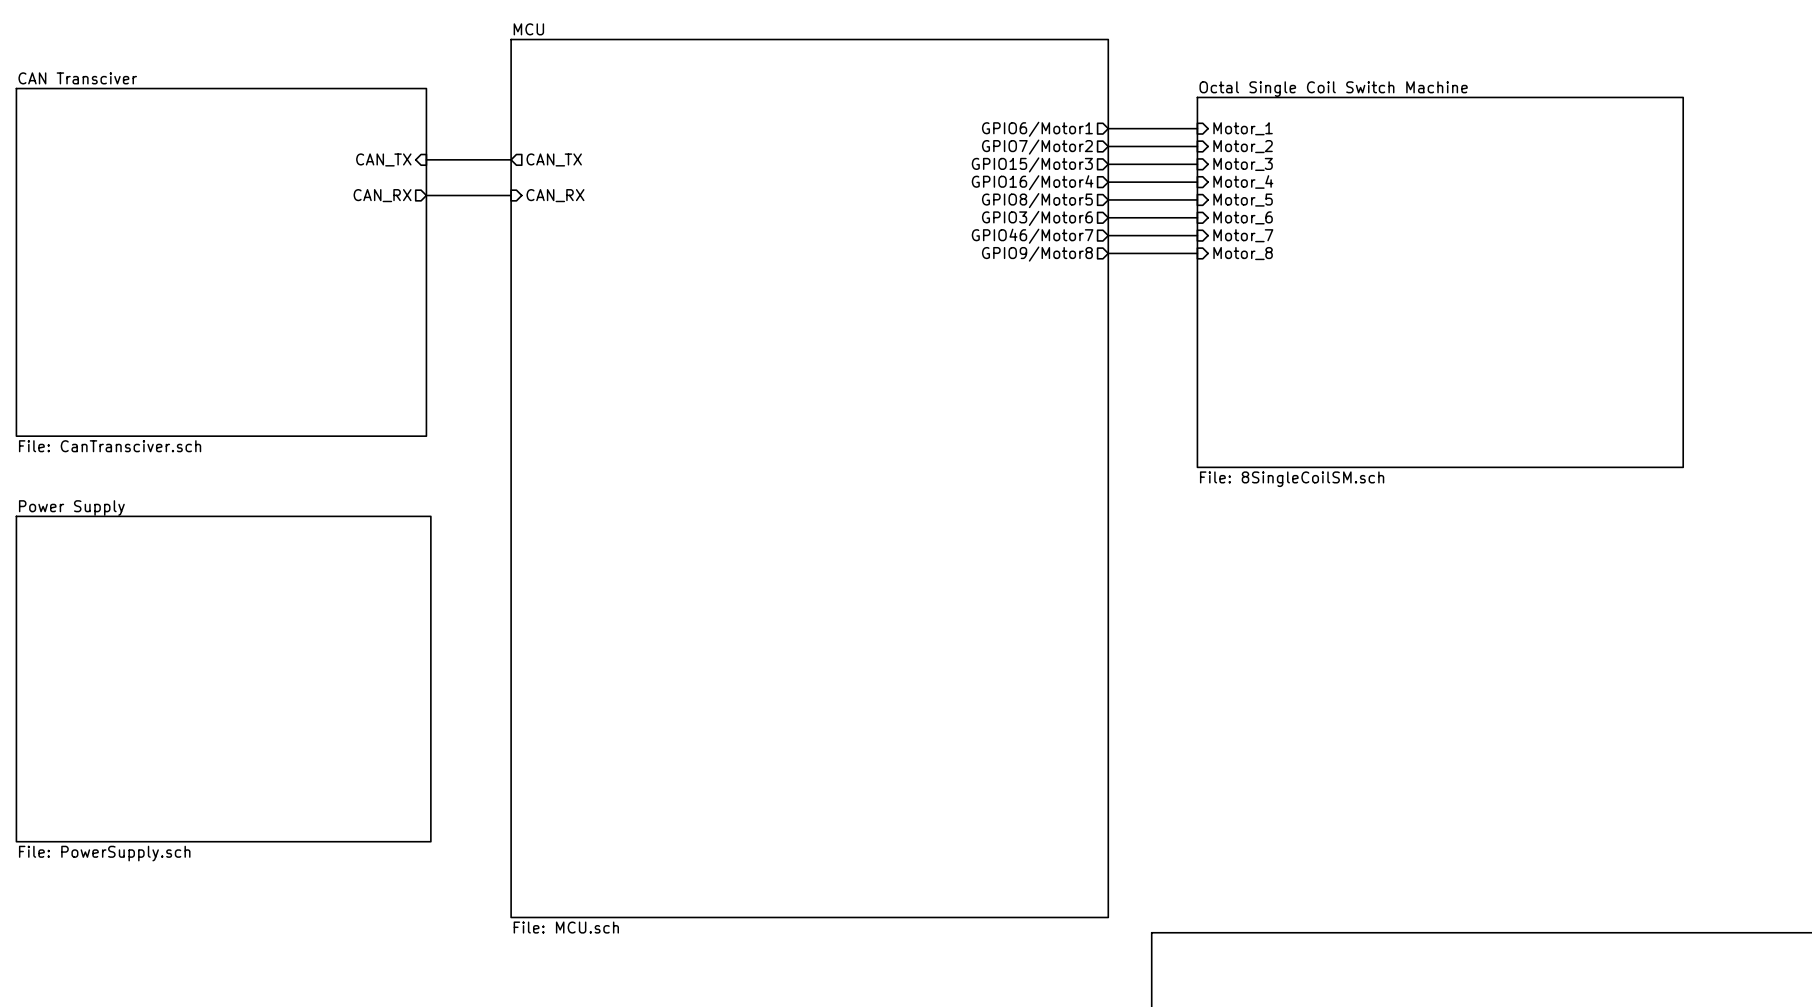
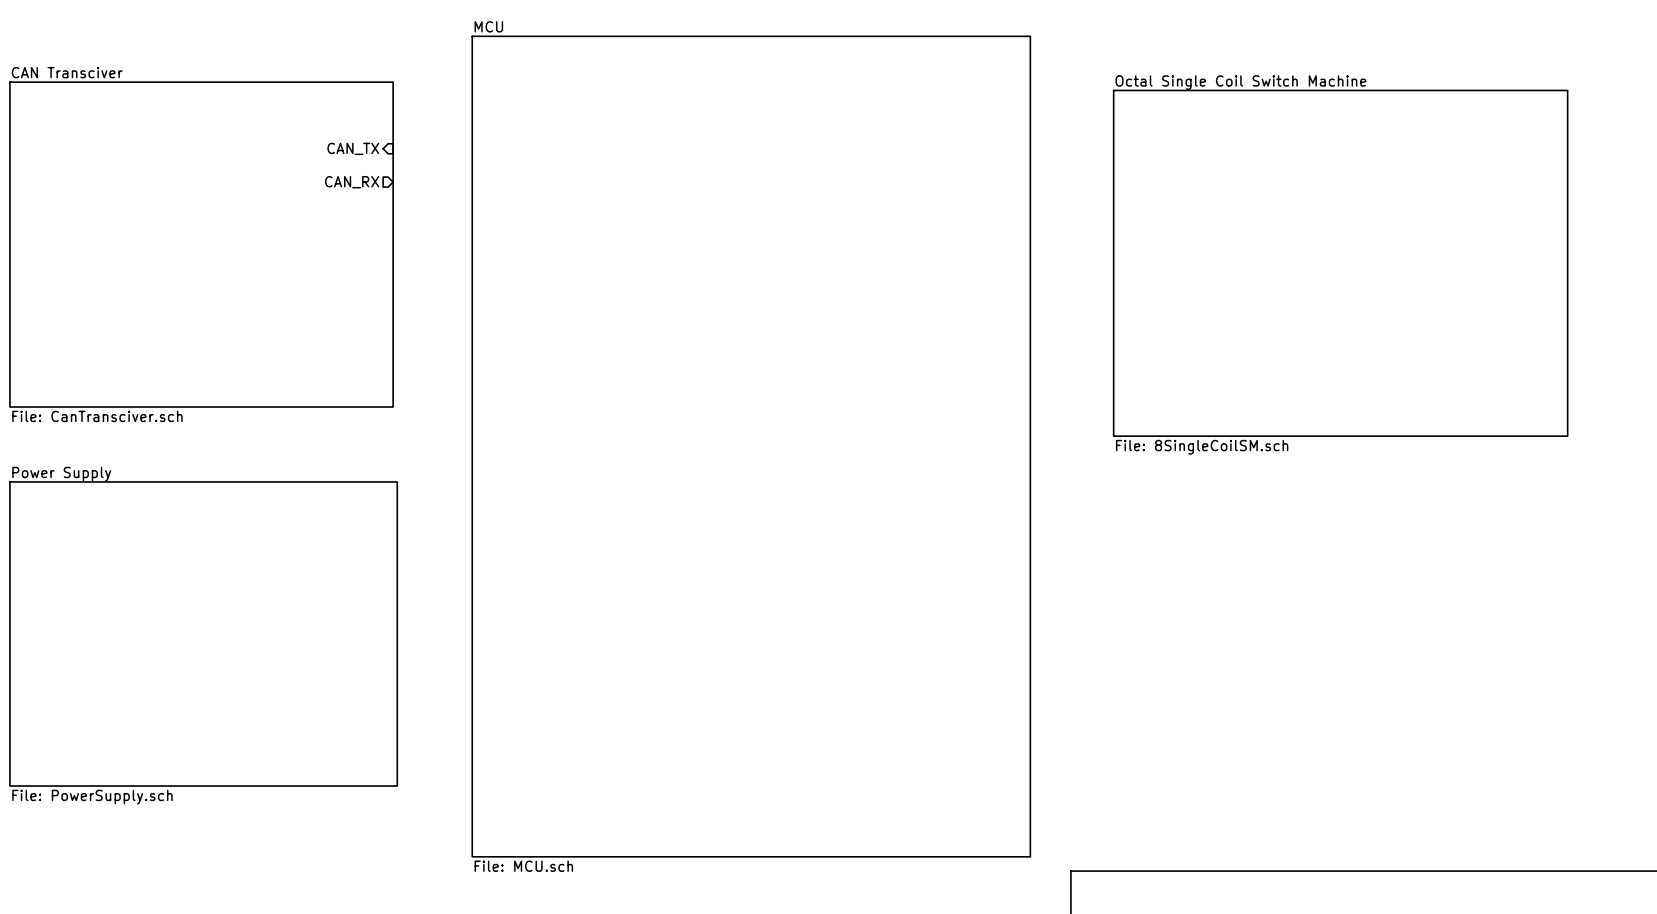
wire: (1108, 128) (1197, 128) -> none
sheet pin: Motor_1 (1243, 128) -> none
sheet pin: GPIO6/Motor1 (1037, 129) -> none
wire: (1108, 146) (1197, 146) -> none
sheet pin: Motor_2 (1243, 146) -> none
sheet pin: GPIO7/Motor2 (1037, 147) -> none
wire: (426, 159) (511, 159) -> none
sheet pin: CAN_TX (554, 159) -> none
sheet pin: GPIO15/Motor3 (1032, 164) -> none
wire: (1108, 164) (1197, 164) -> none
sheet pin: Motor_3 (1243, 164) -> none
sheet pin: Motor_4 (1243, 181) -> none
sheet pin: GPIO16/Motor4 (1032, 182) -> none
wire: (1108, 182) (1197, 182) -> none
wire: (426, 195) (511, 195) -> none
sheet pin: CAN_RX (555, 195) -> none
wire: (1108, 199) (1197, 199) -> none
sheet pin: GPIO8/Motor5 (1037, 200) -> none
sheet pin: Motor_5 (1243, 200) -> none
wire: (1108, 217) (1197, 217) -> none
sheet pin: Motor_6 (1243, 217) -> none
sheet pin: GPIO3/Motor6 (1037, 218) -> none
wire: (1108, 235) (1197, 235) -> none
sheet pin: Motor_7 (1243, 235) -> none
sheet pin: GPIO46/Motor7 (1032, 236) -> none
wire: (1108, 253) (1197, 253) -> none
sheet pin: Motor_8 (1243, 253) -> none
sheet pin: GPIO9/Motor8 (1037, 254) -> none

